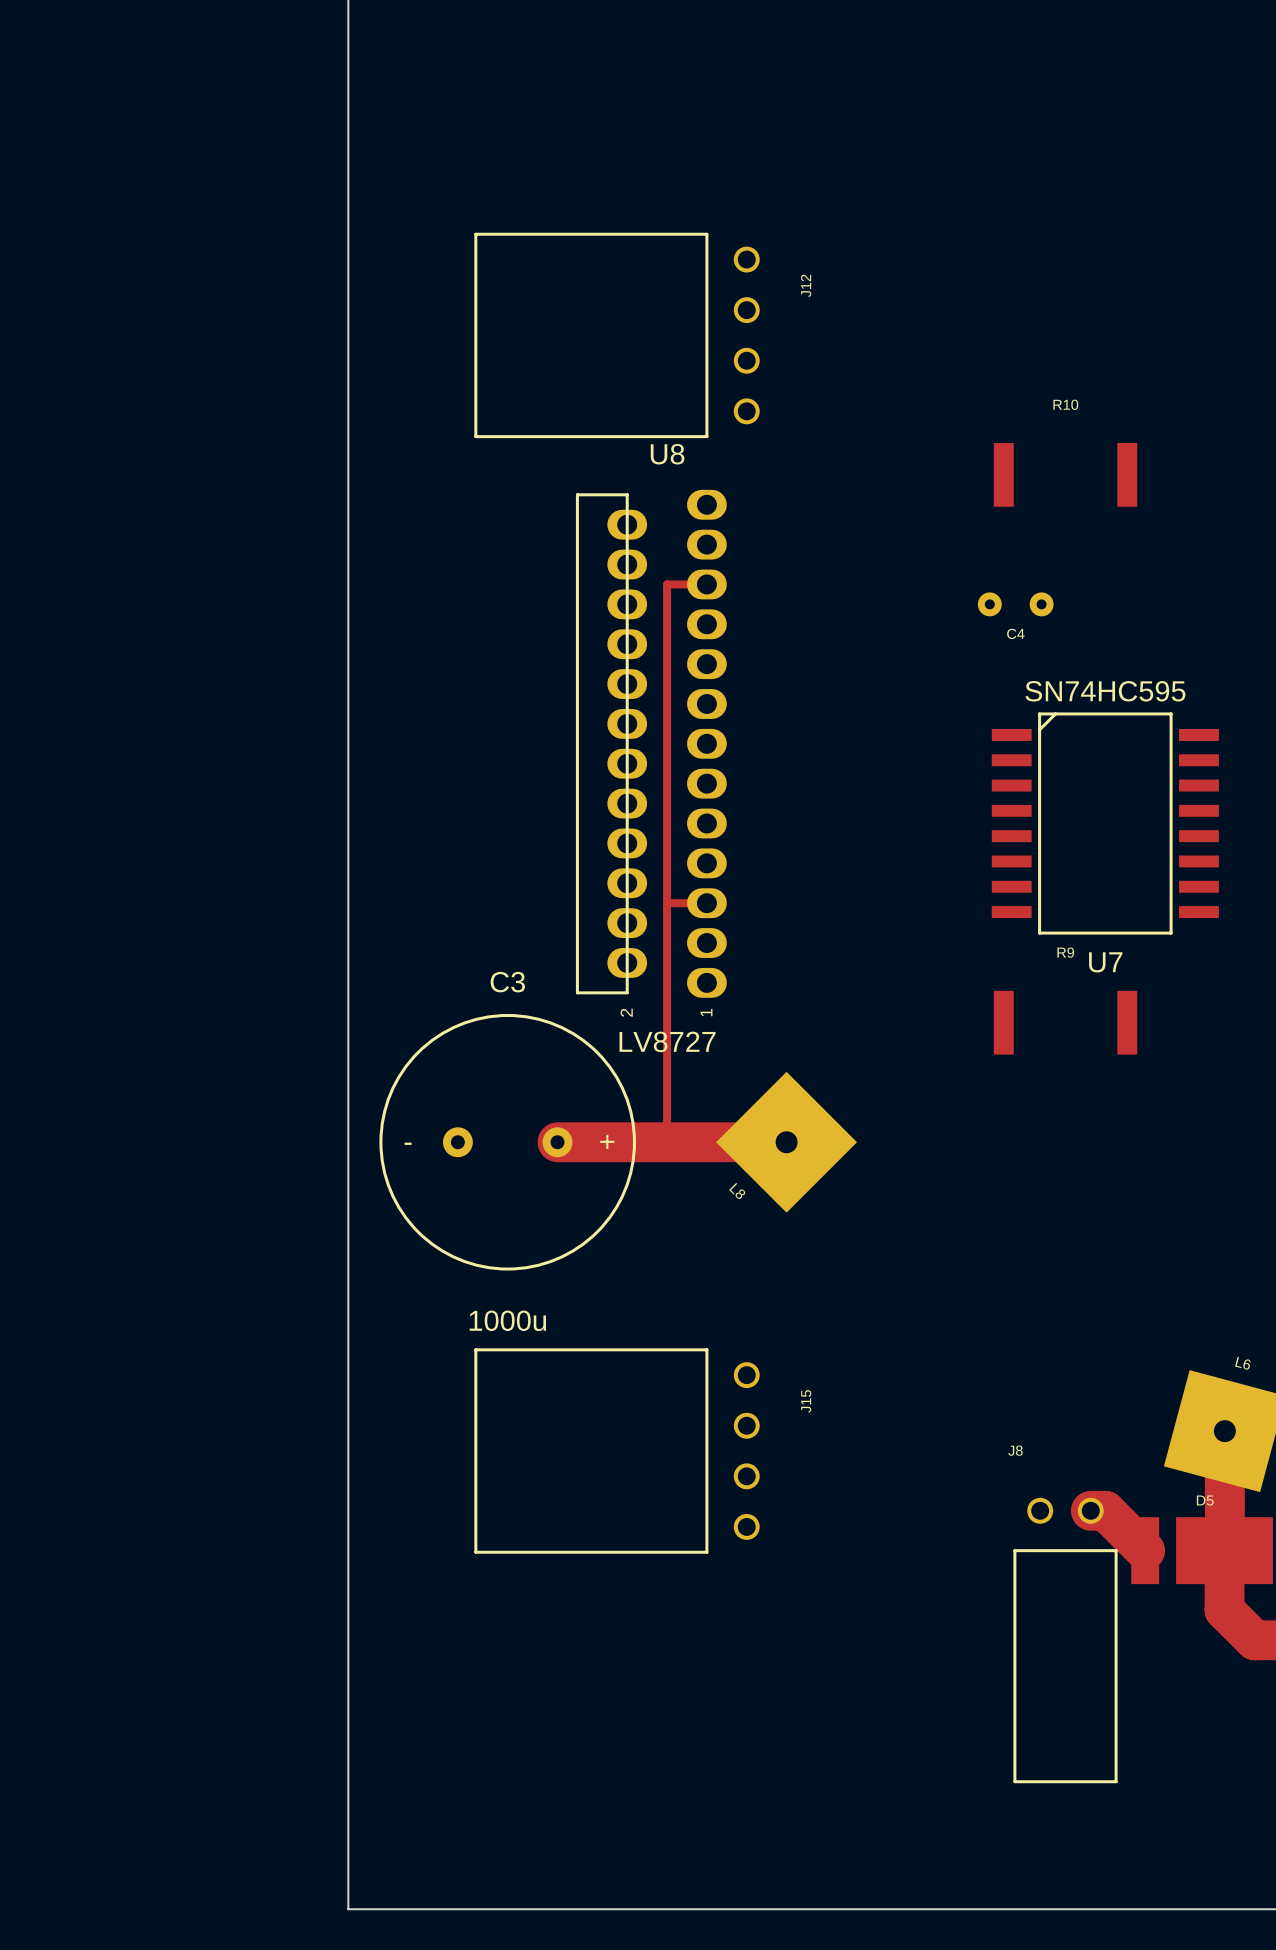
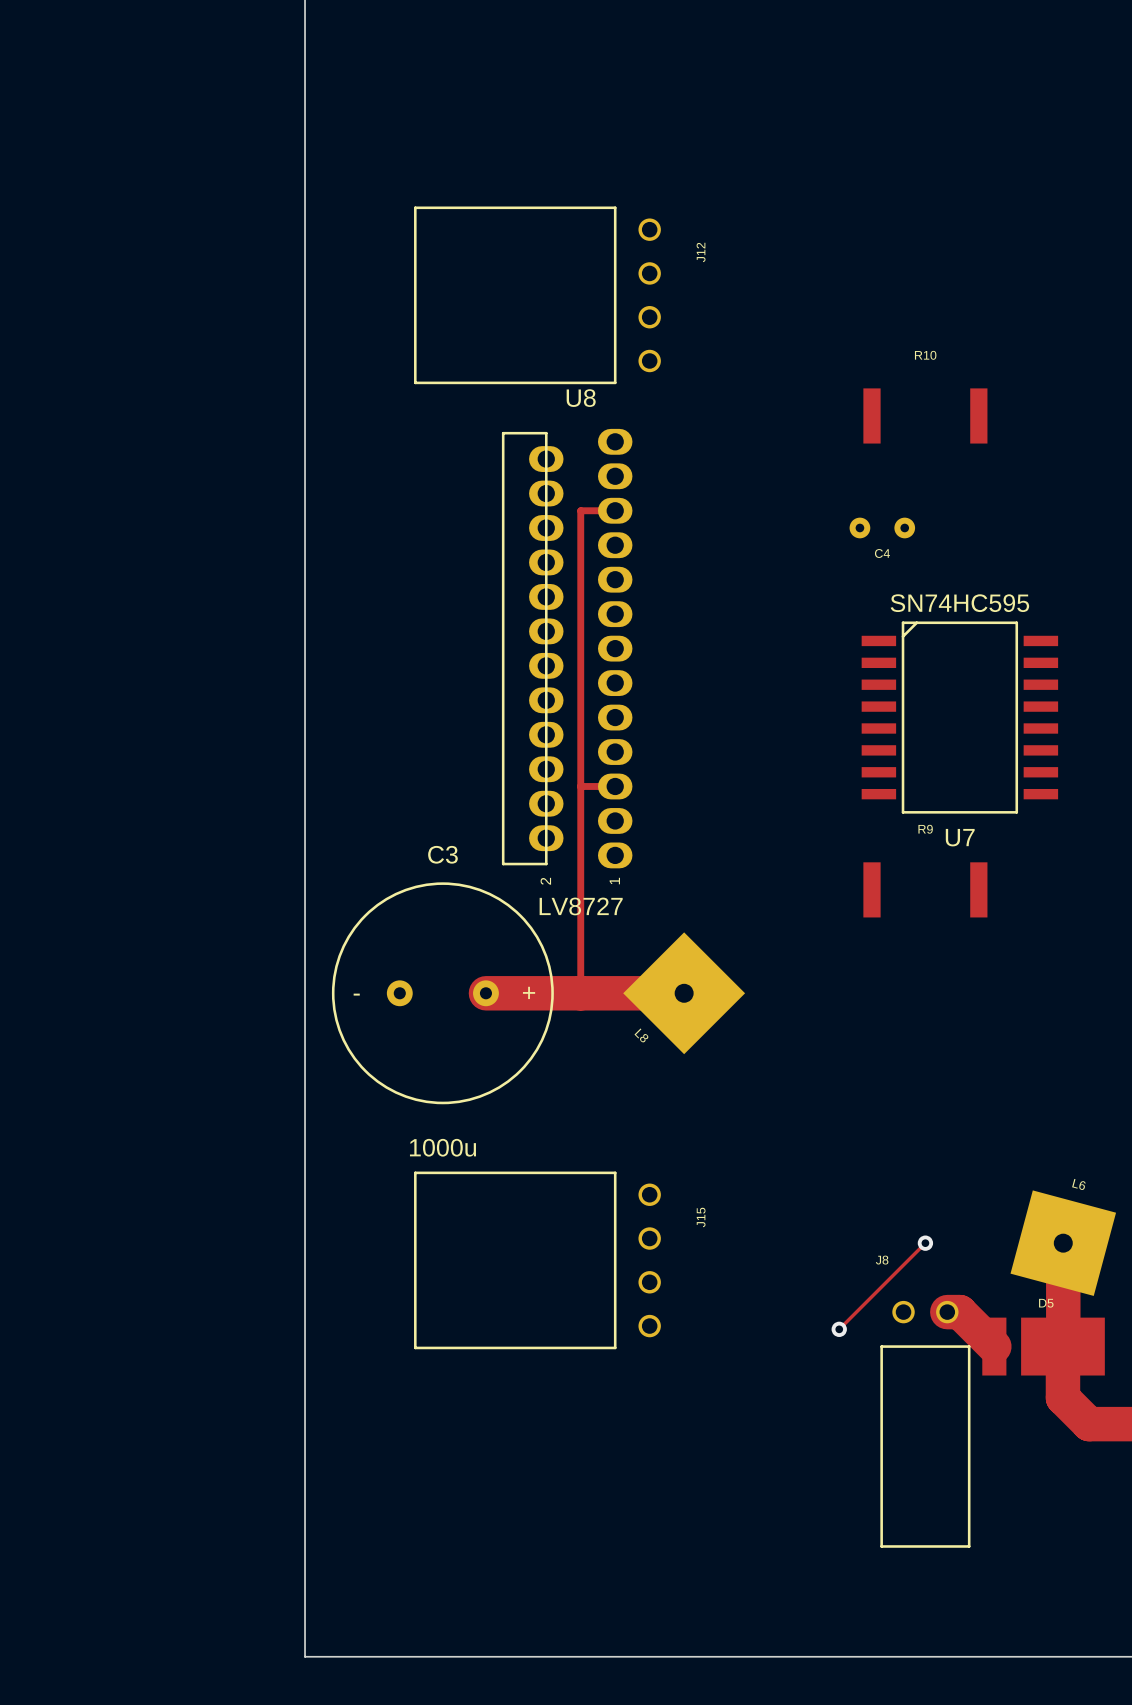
track: none -> (925, 1243) (839, 1329)
via: none -> (925, 1243)
via: none -> (839, 1329)

